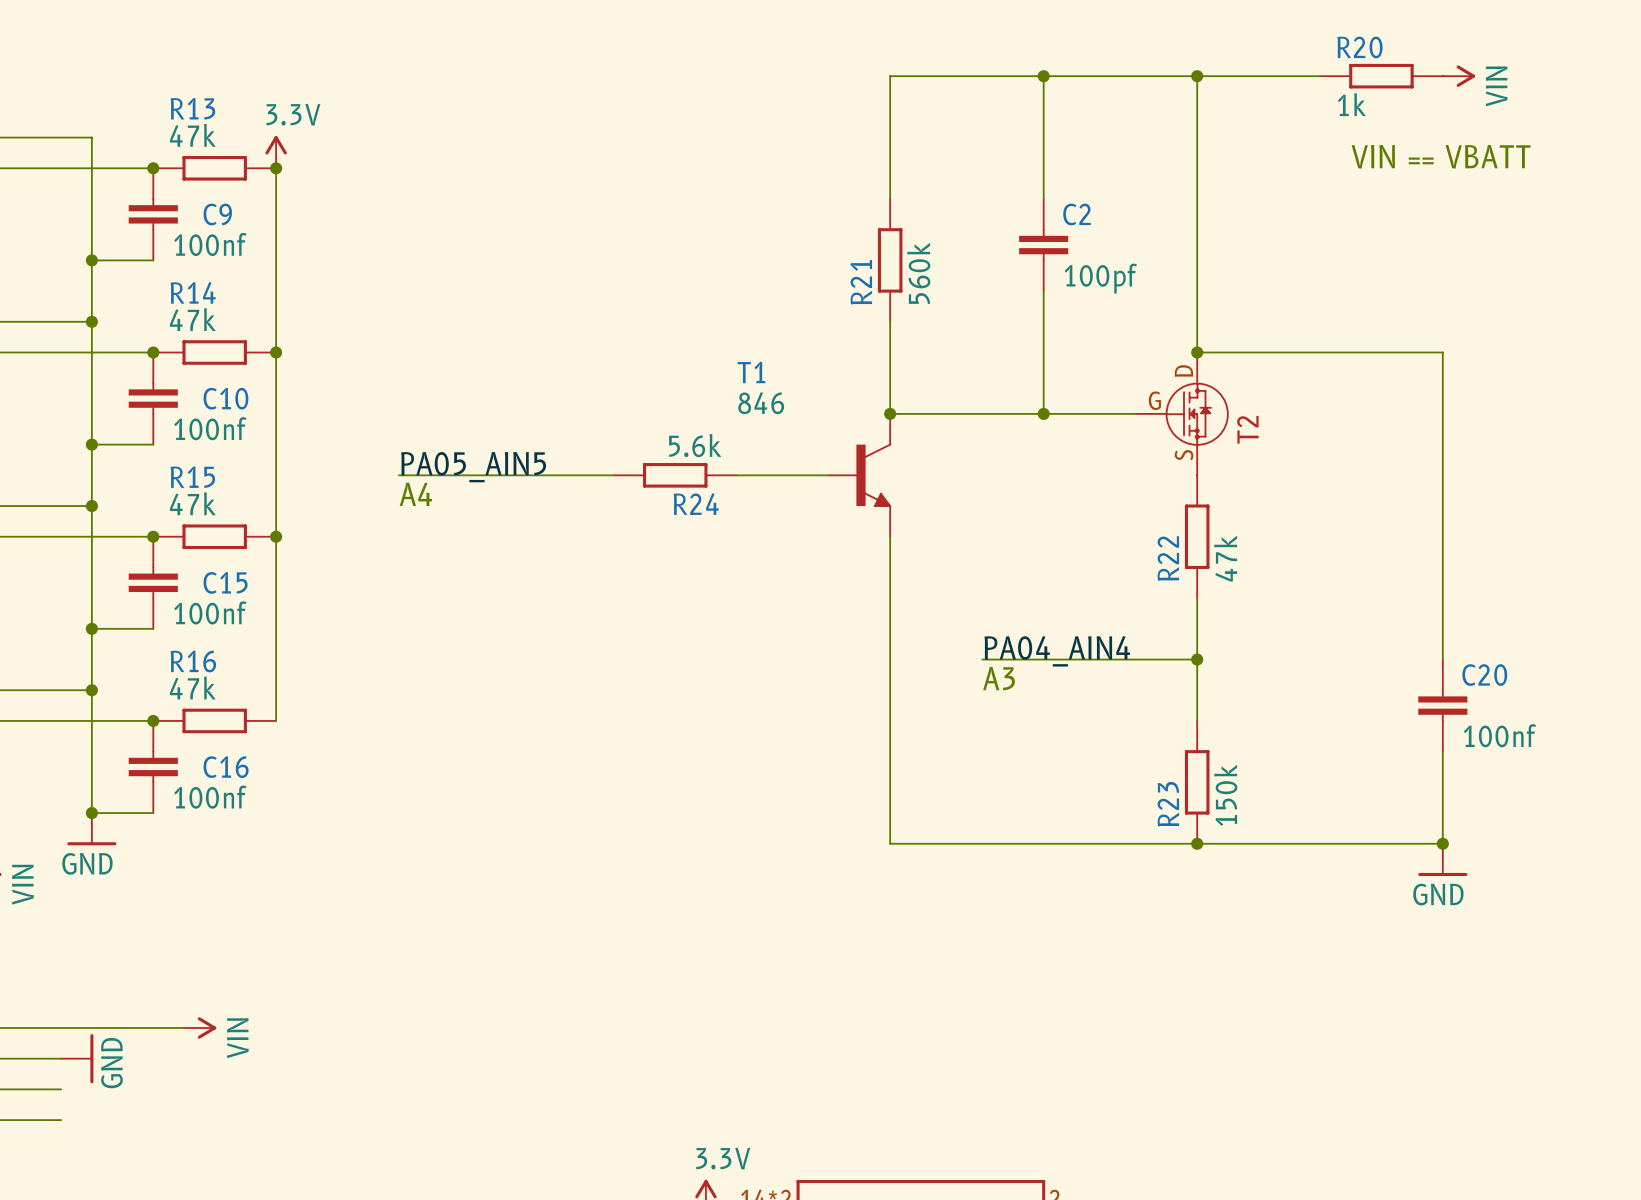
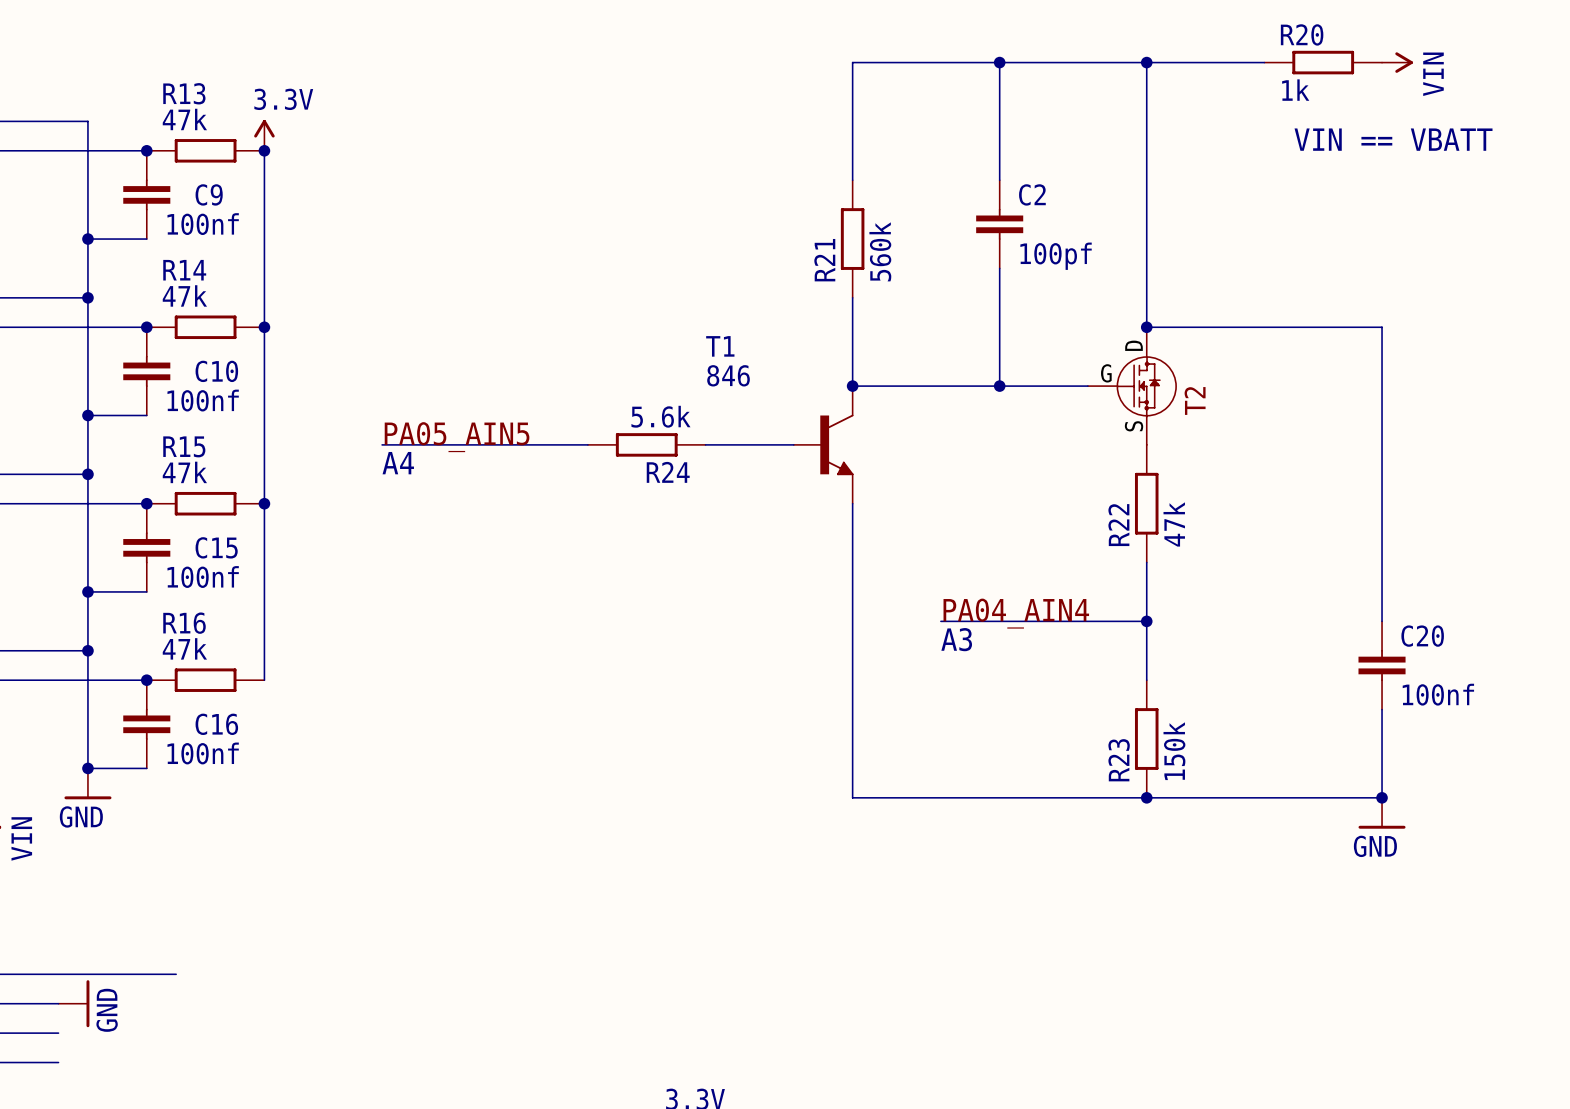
power symbol: VIN (200, 1027) -> none

